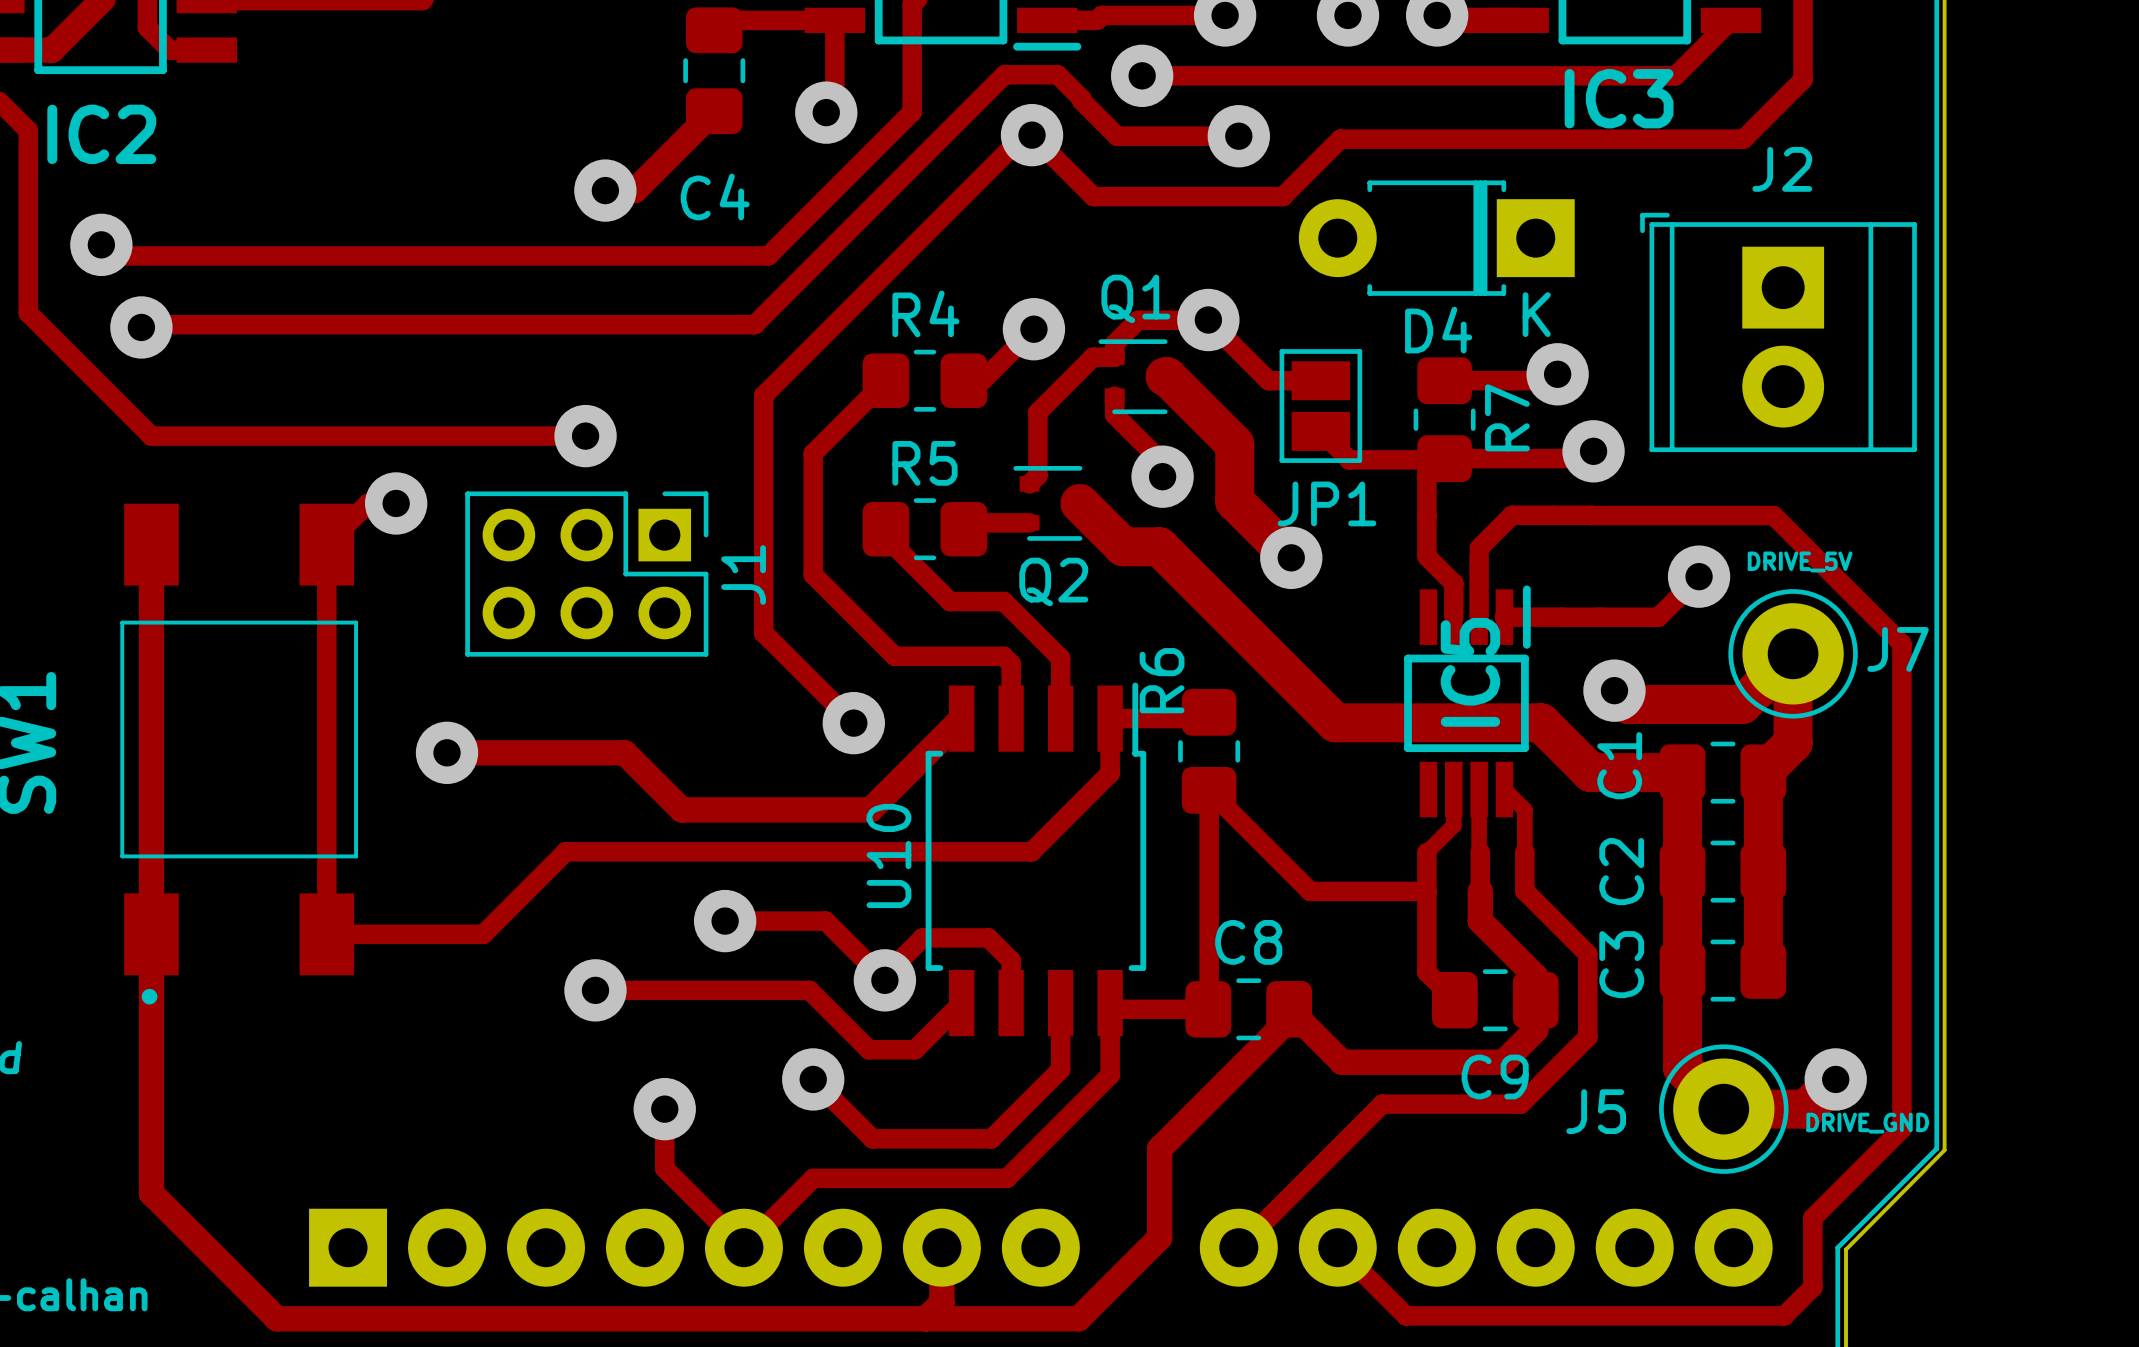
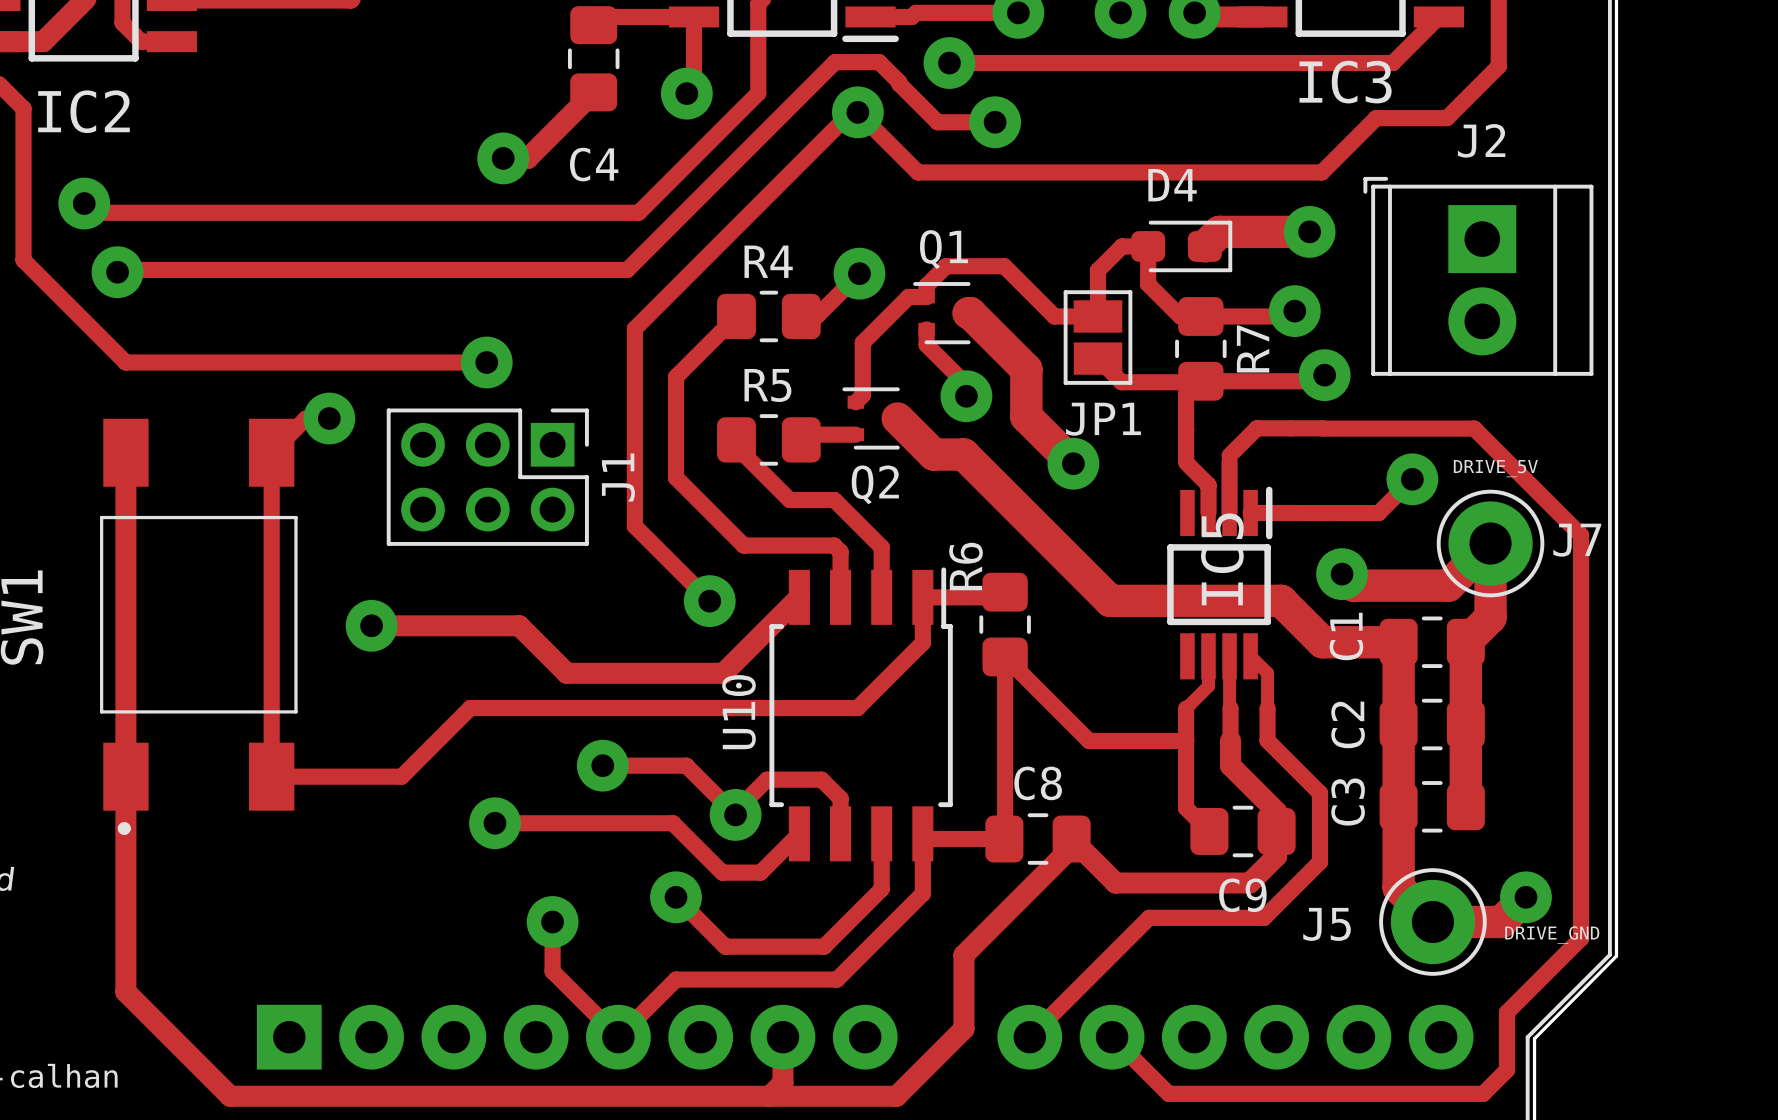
track: (1117, 136) (1238, 136) -> (928, 113) (937, 122) (995, 122)
via position: (1238, 136) -> (995, 122)
track: (1743, 139) (1340, 139) (1282, 196) (1093, 196) -> (1449, 115) (1446, 118) (1376, 118) (1321, 172) (918, 172) (908, 163)
D4 footprint: [1298, 180, 1575, 296] -> [1131, 220, 1233, 273]
track: none -> (1309, 231) (1219, 231) (1204, 246)
via: none -> (1309, 231)
via: (1208, 320) -> none
D4 name position: D4 (1438, 330) -> D4 (1172, 185)
track: none -> (1098, 316) (1098, 270) (1121, 246) (1148, 246) (1148, 284) (1180, 316) (1200, 316)

